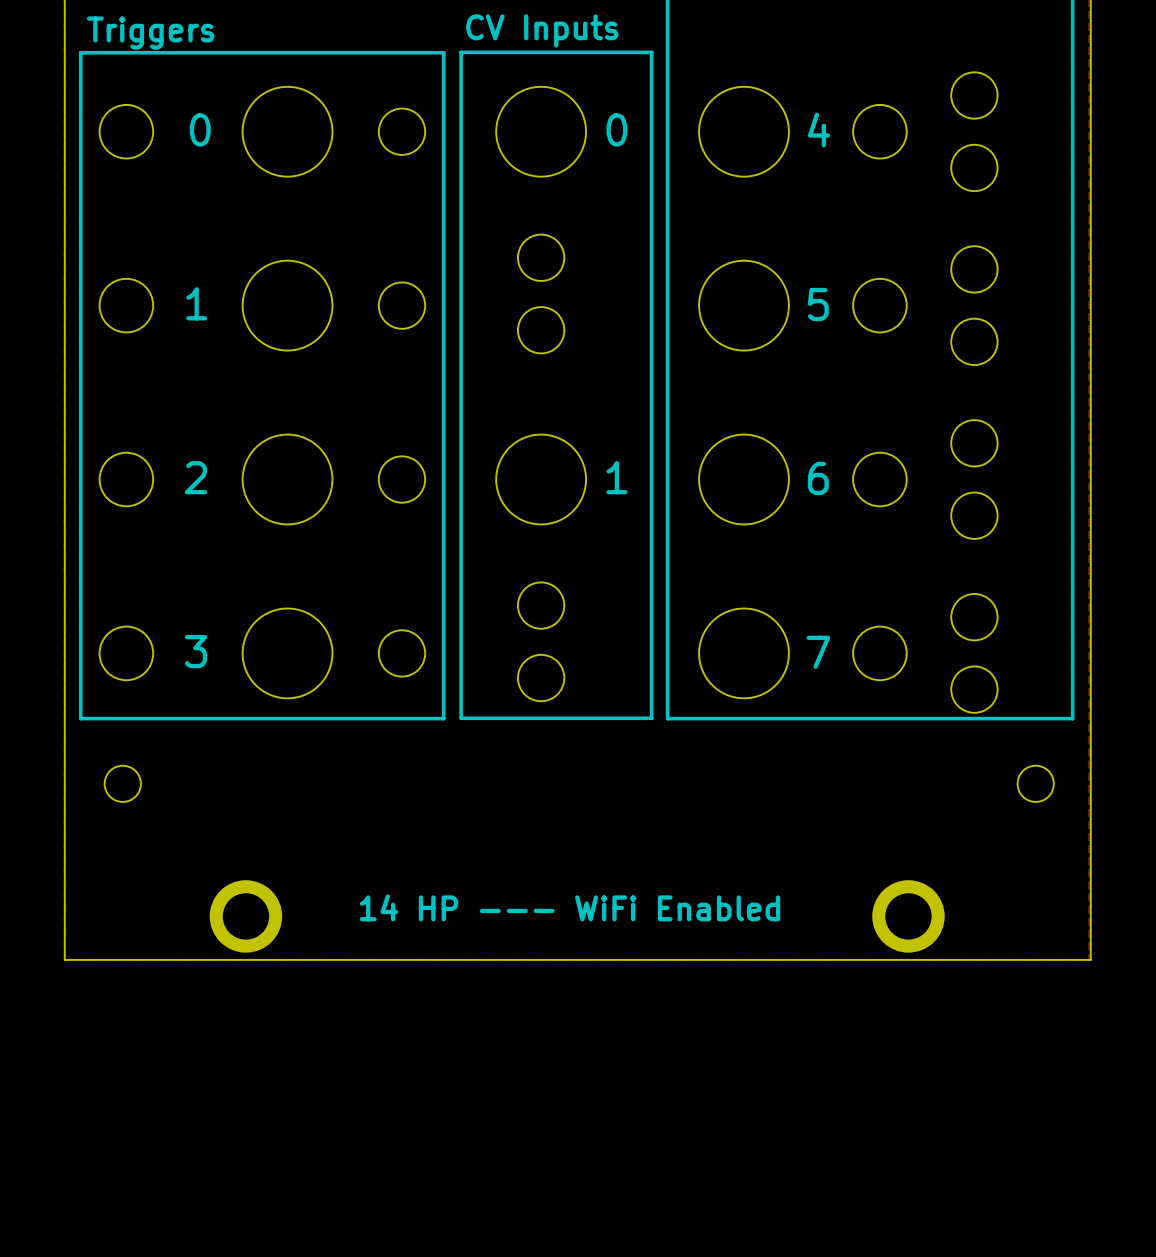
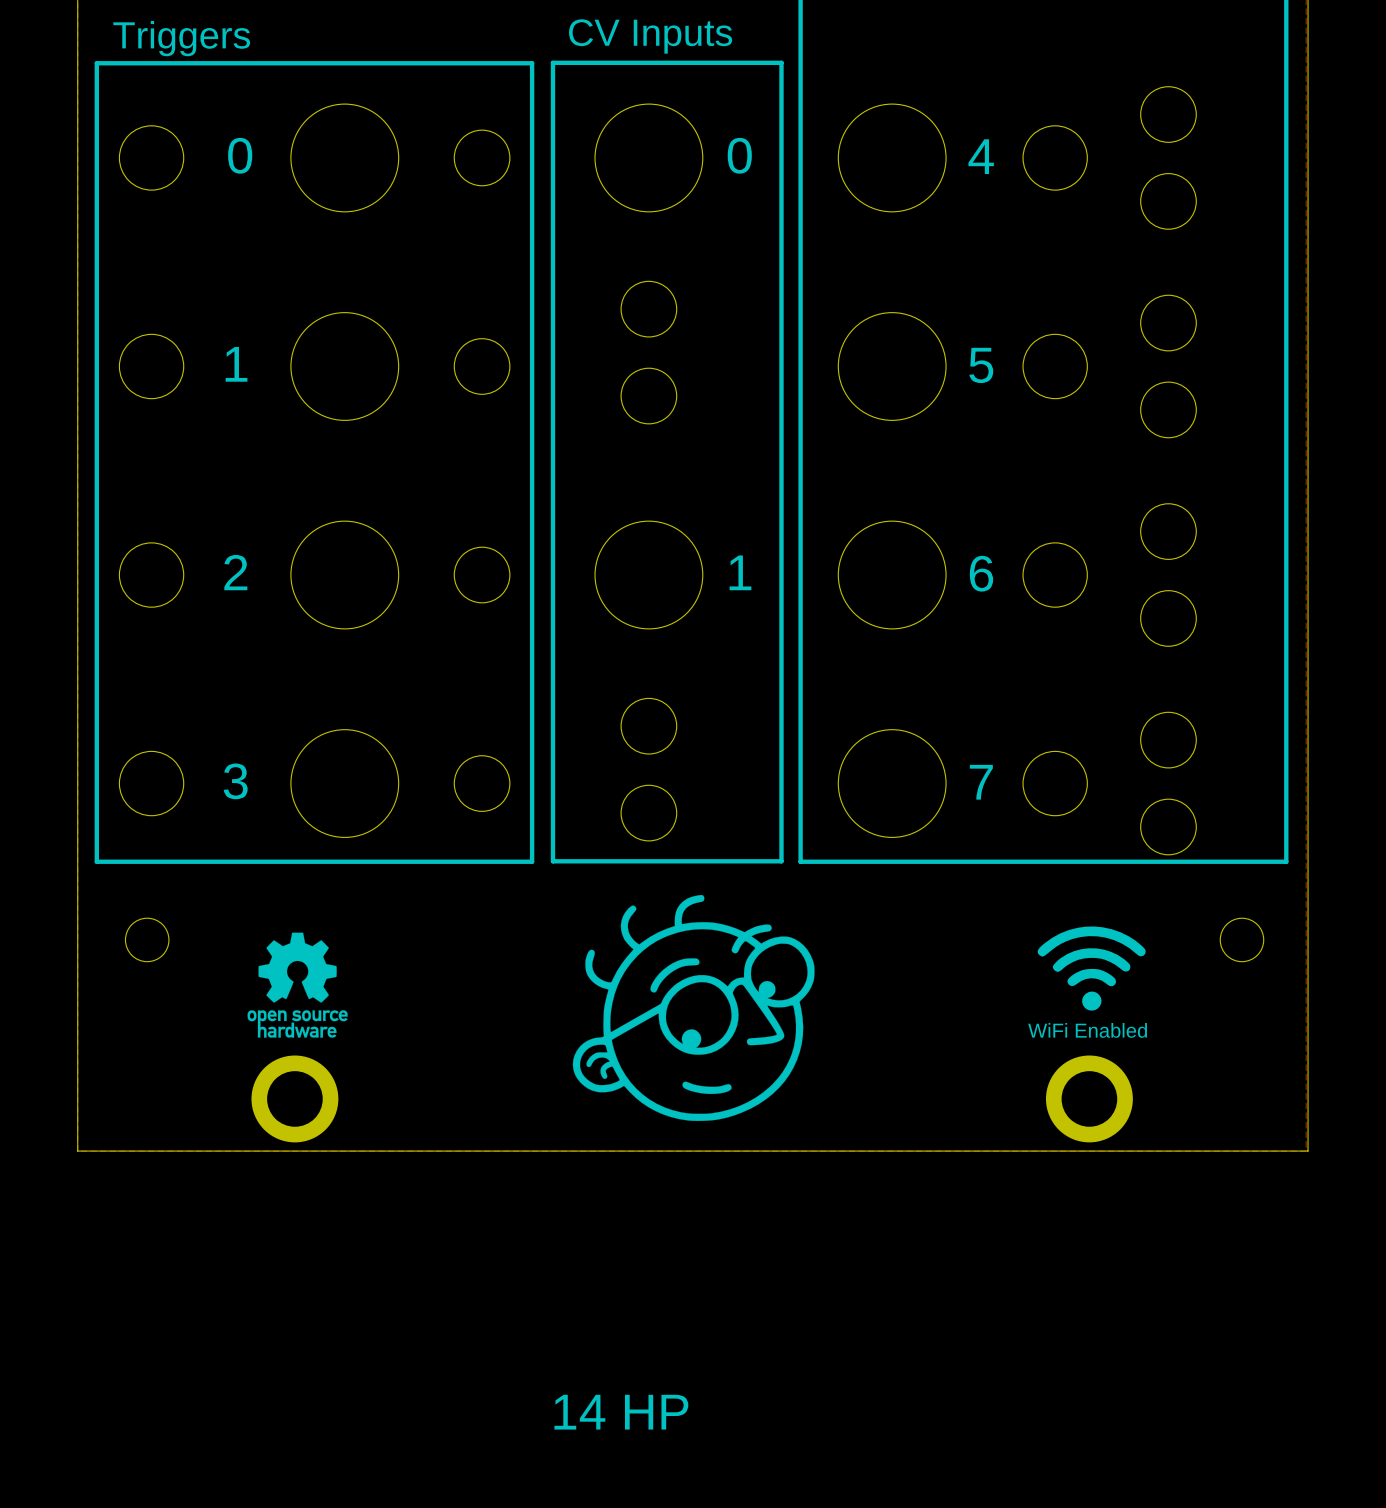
drawing: none -> [572, 895, 815, 1121]
drawing: none -> [1037, 926, 1146, 1011]
drawing: none -> [247, 932, 348, 1038]
text: none -> WiFi Enabled (1087, 1030)
text: 14 HP --- WiFi Enabled (570, 907) -> none
text: none -> 14 HP (621, 1412)

